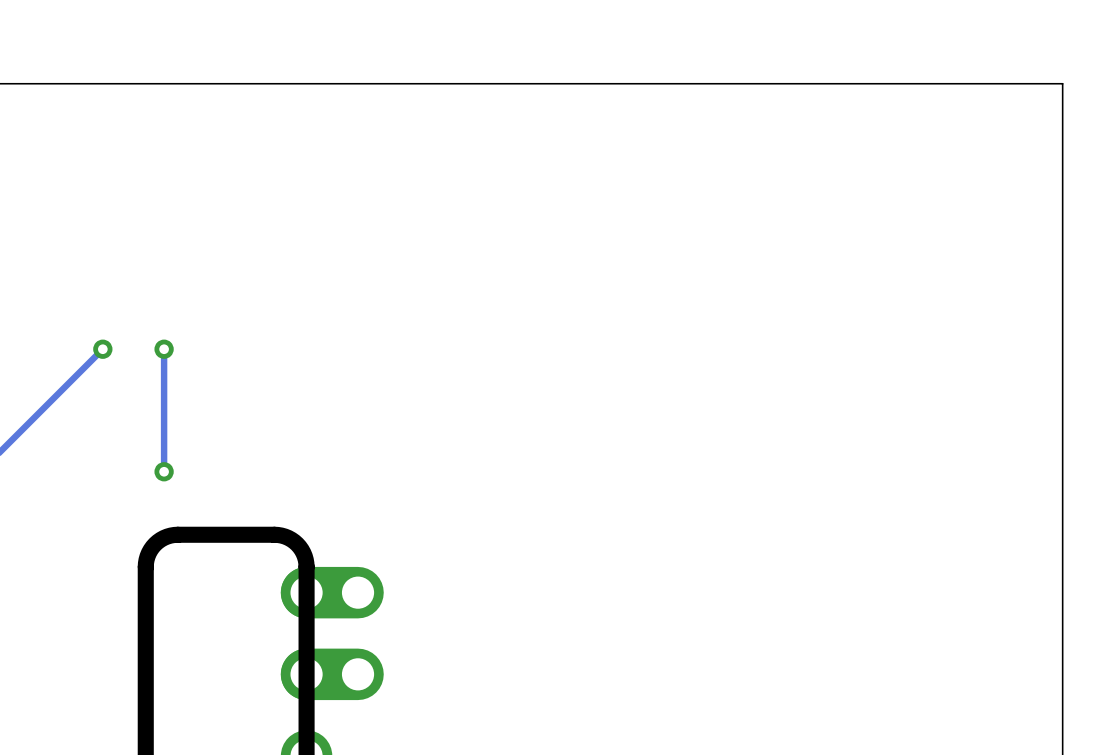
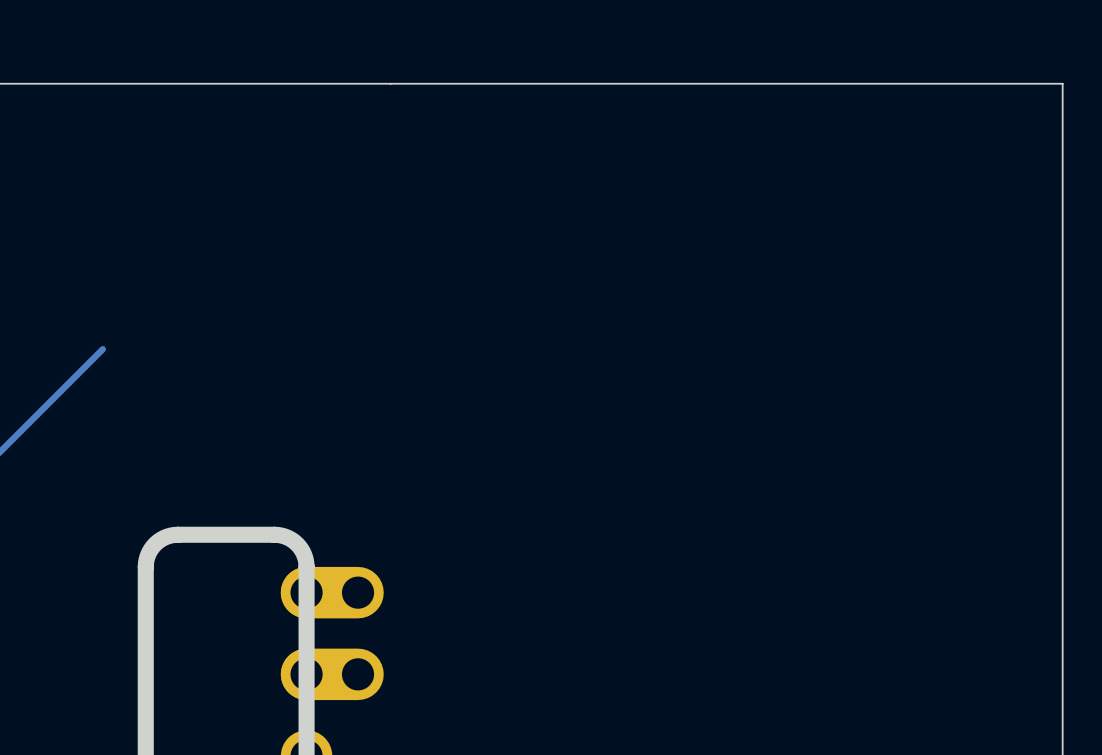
via: (102, 349) -> none
track: (164, 349) (164, 471) -> none
via: (164, 349) -> none
via: (164, 471) -> none

